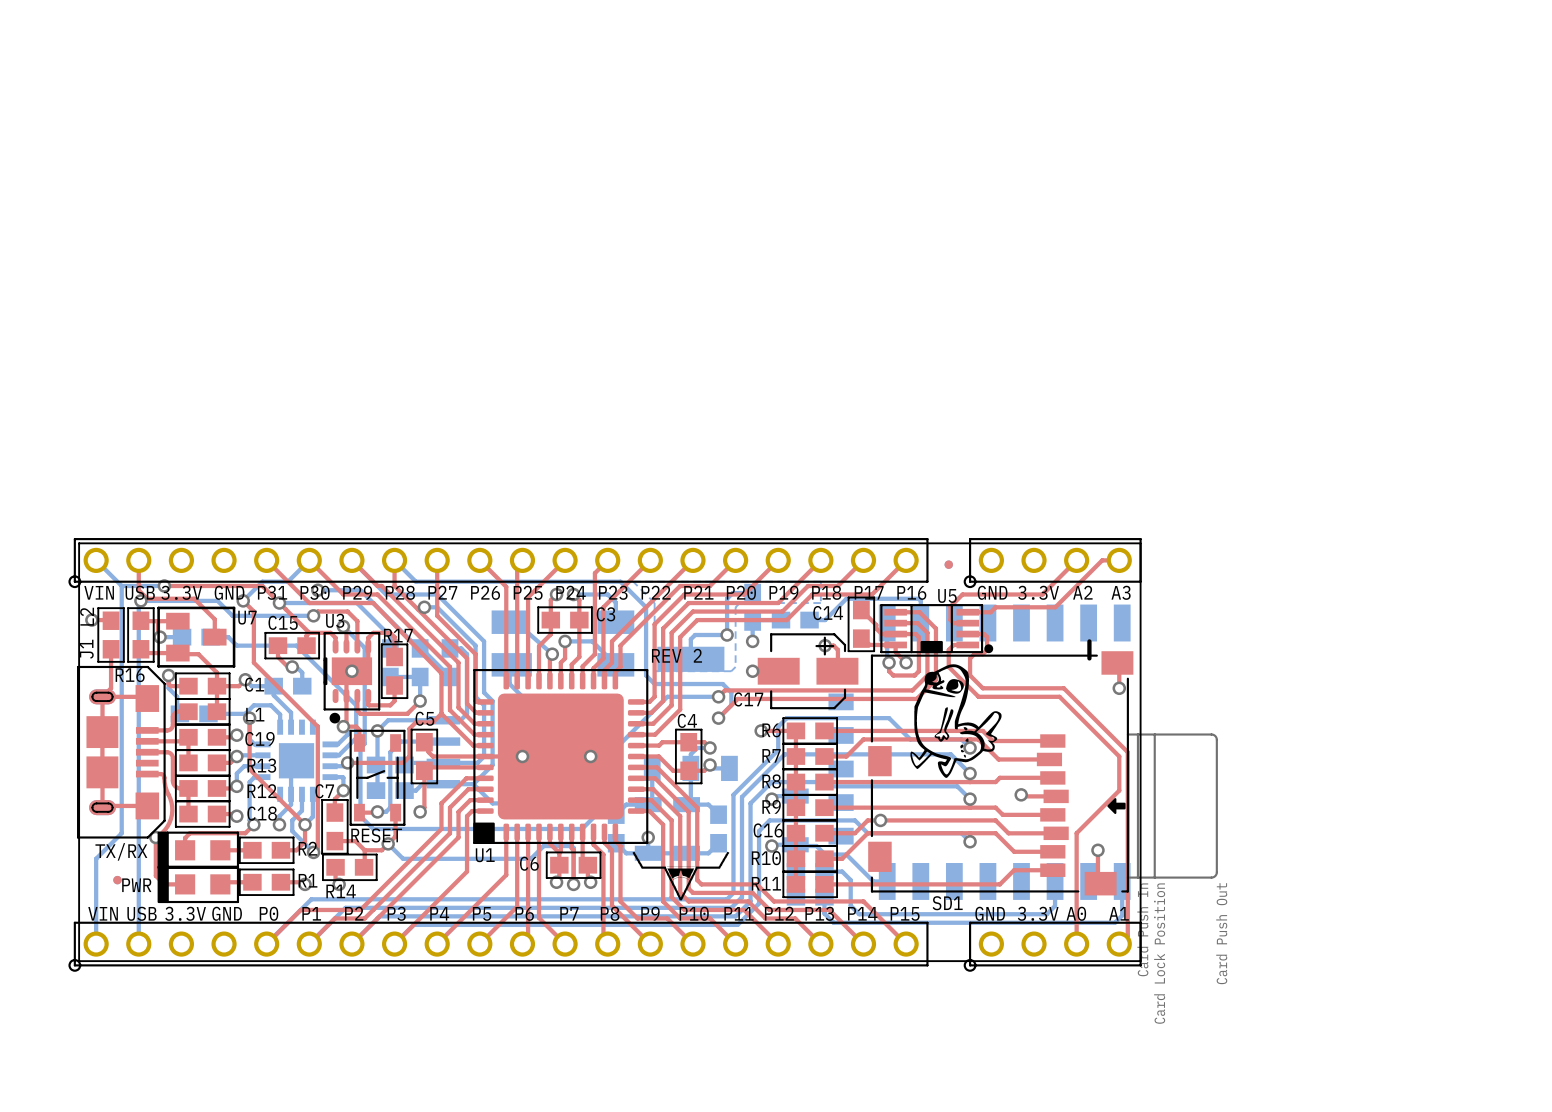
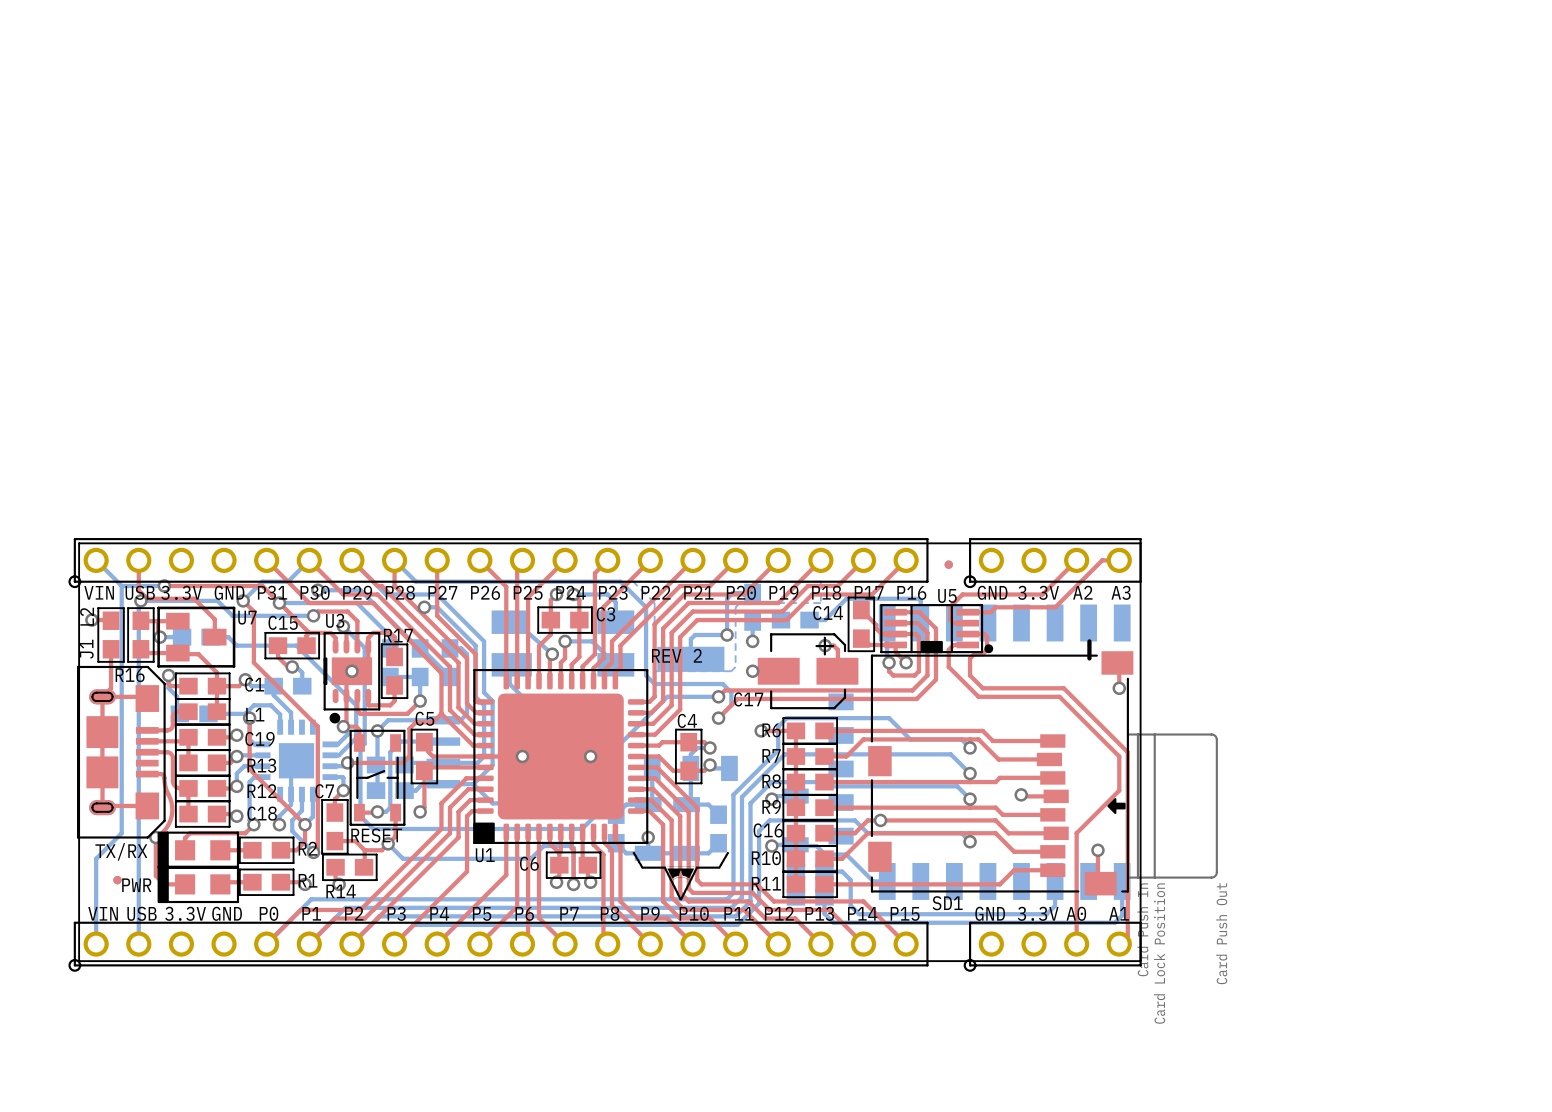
drawing: [910, 664, 1002, 778] -> none

